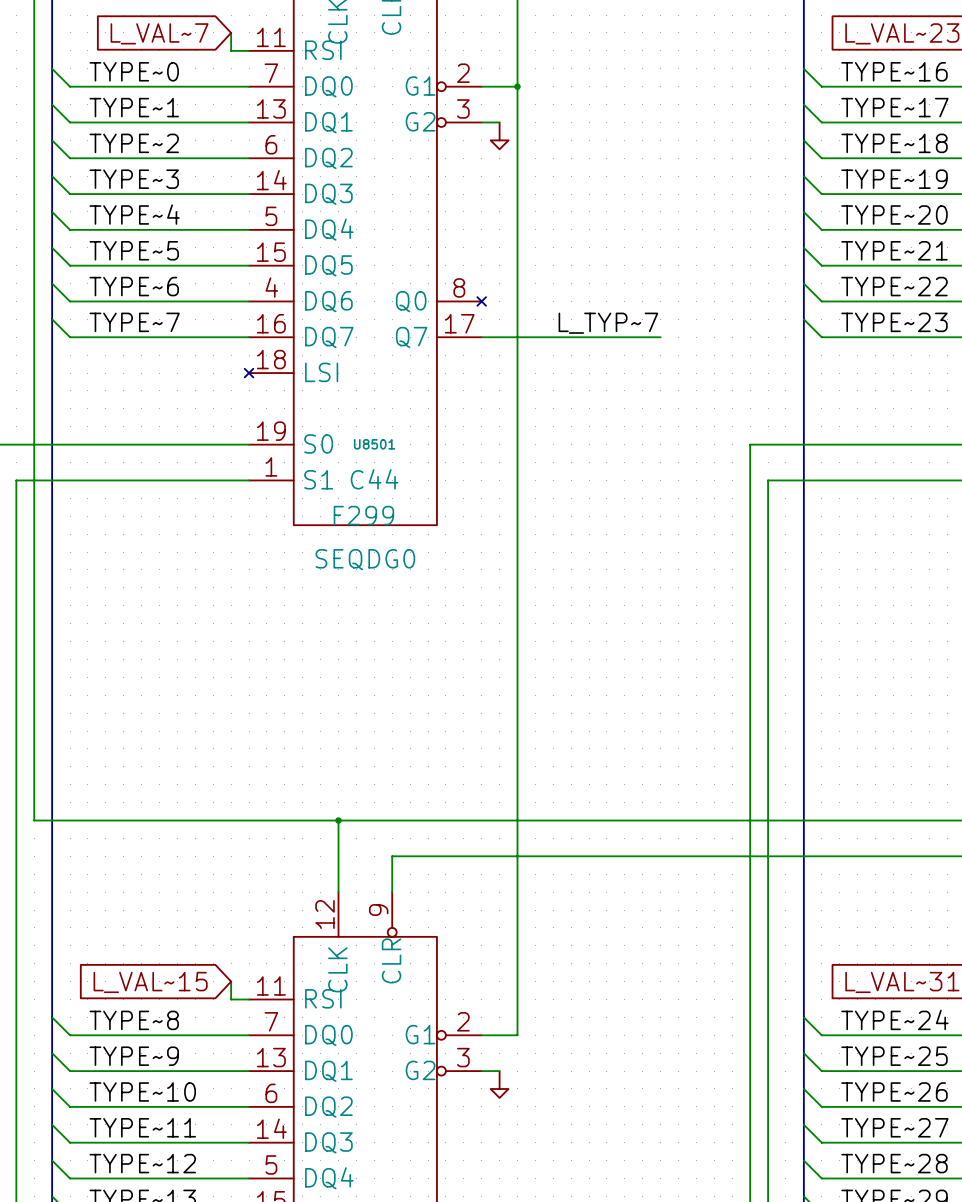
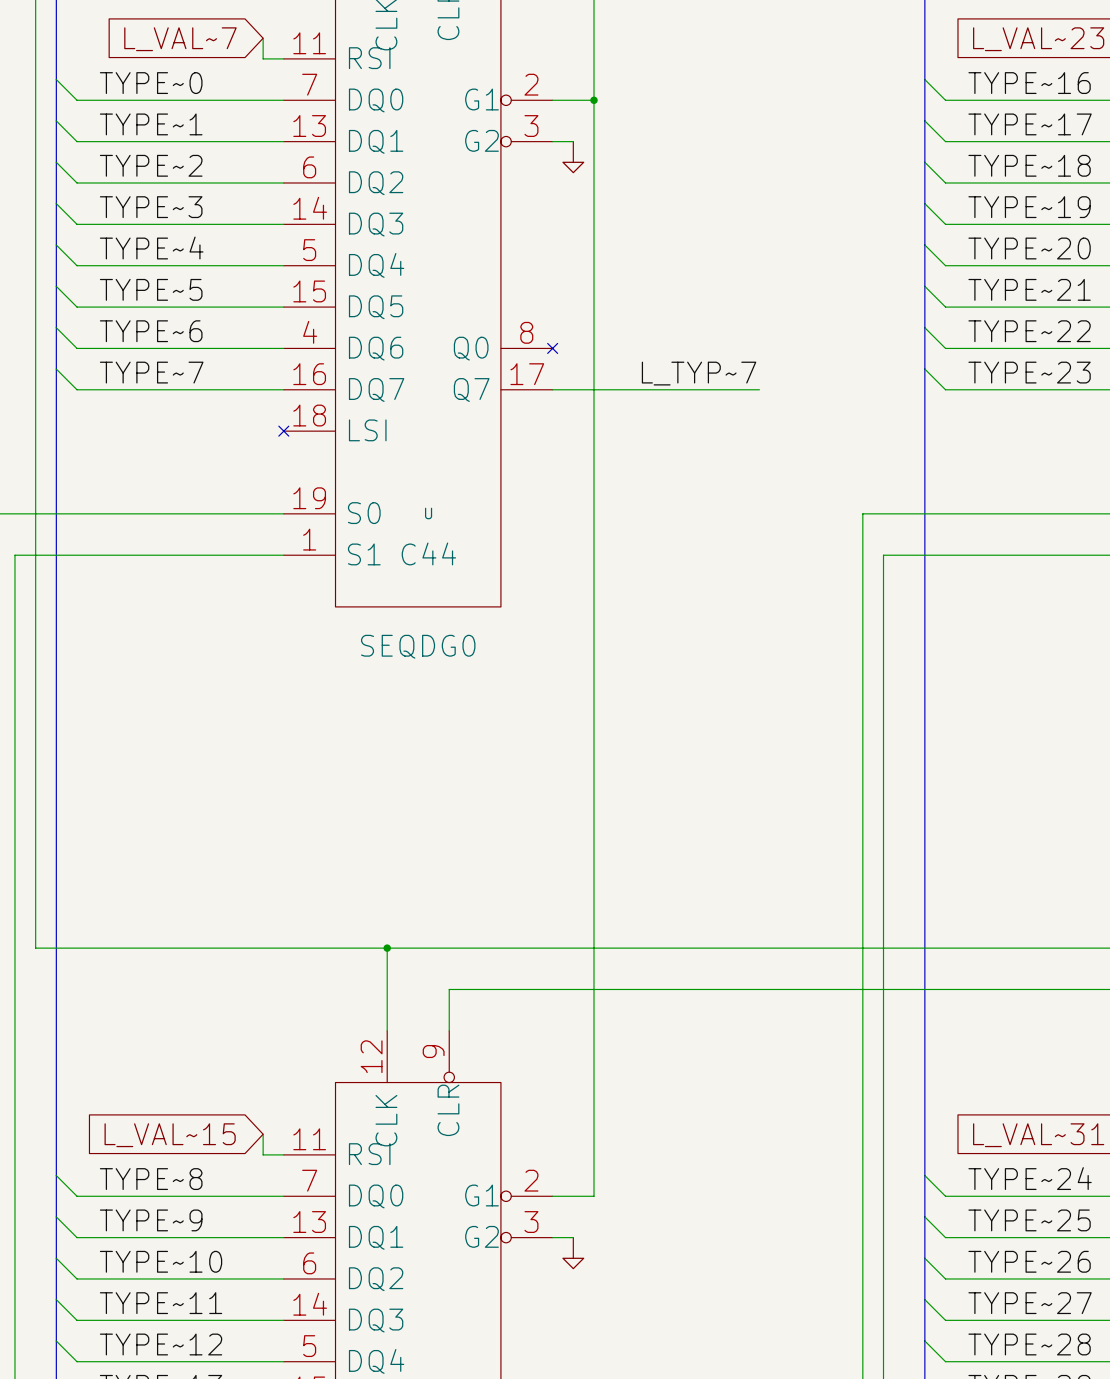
U8501 name: U8501 (374, 444) -> U (428, 513)
U8501 value: F299 (363, 515) -> none

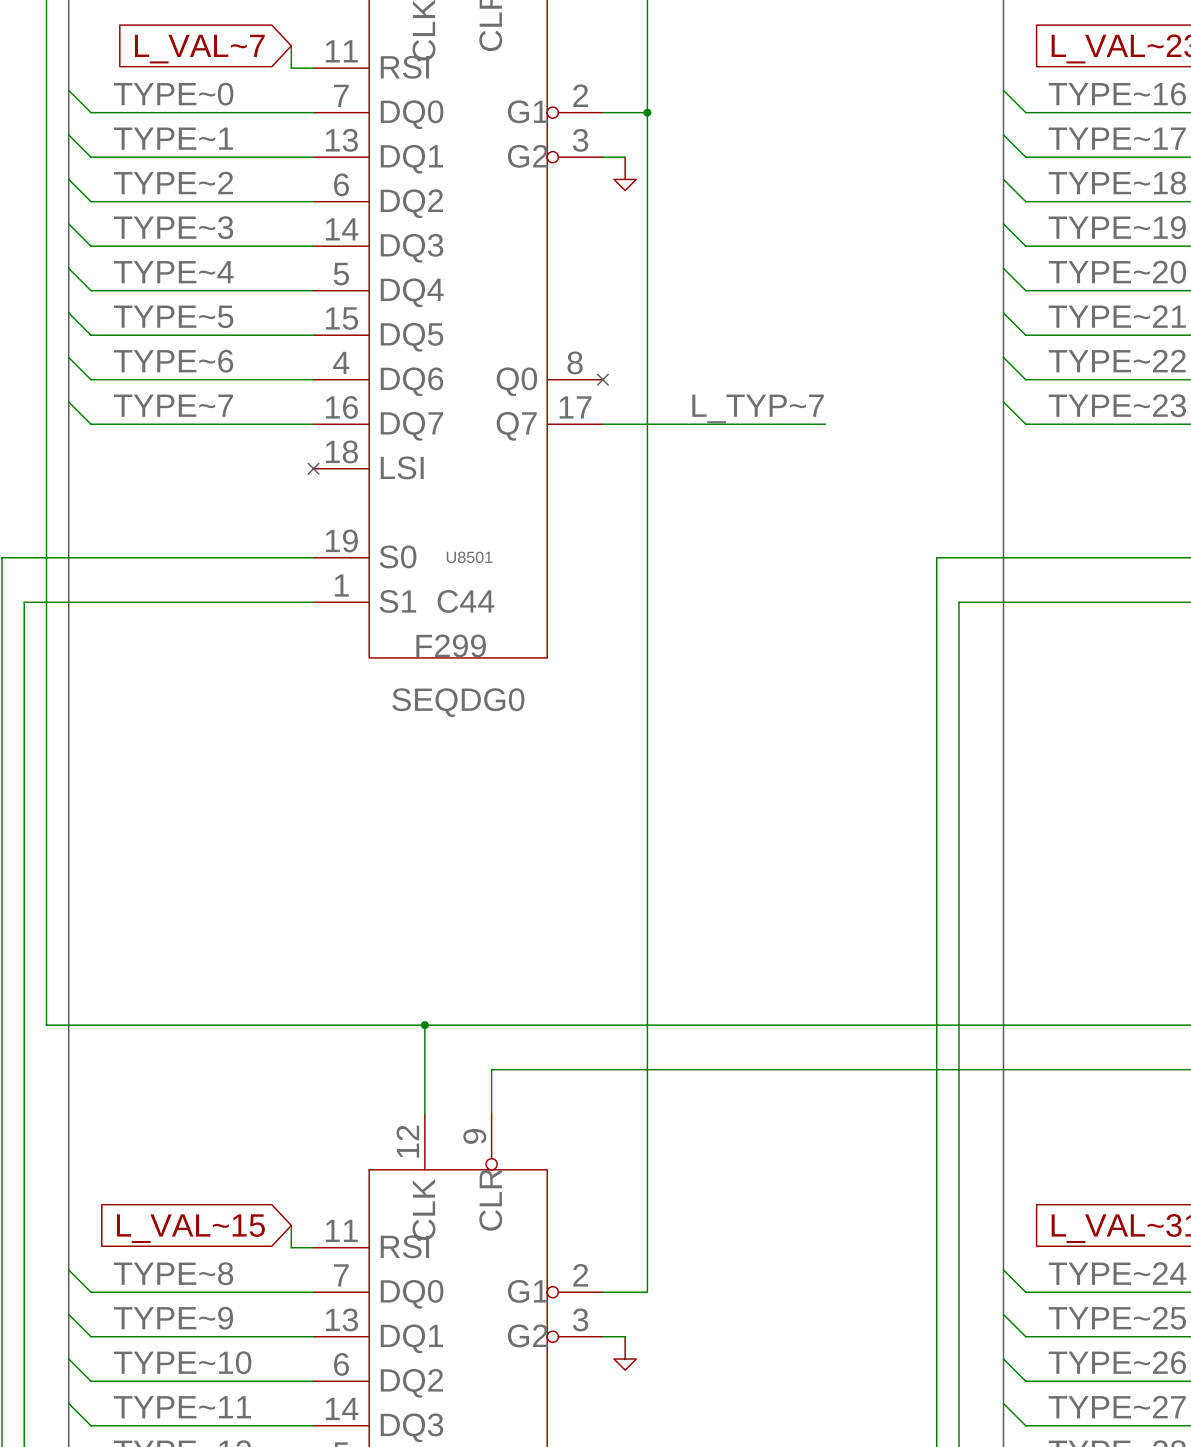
U name: U (428, 513) -> U8501 (469, 557)
U value: none -> F299 (451, 645)

